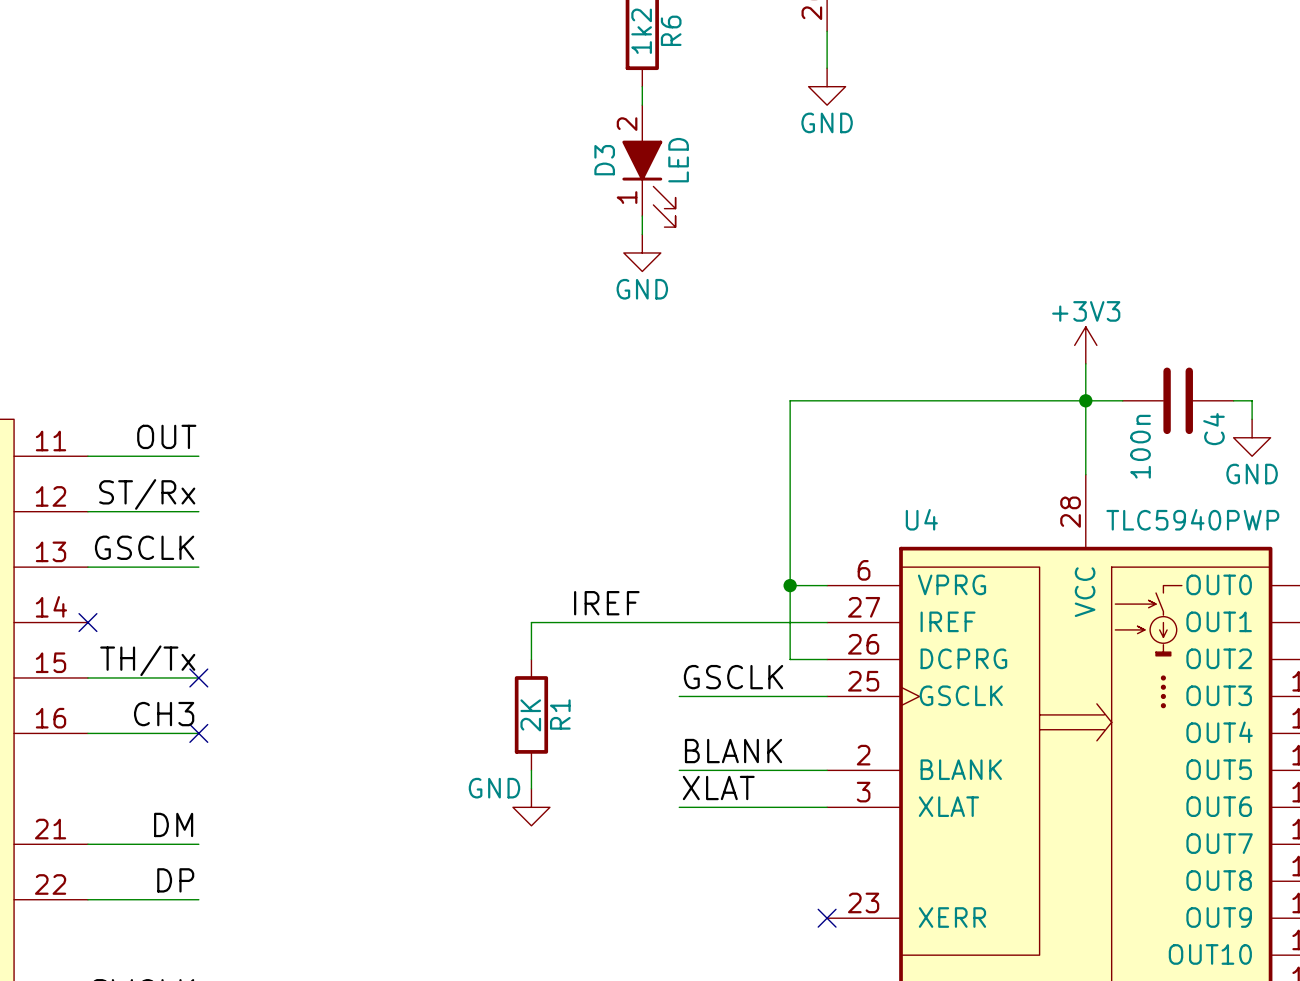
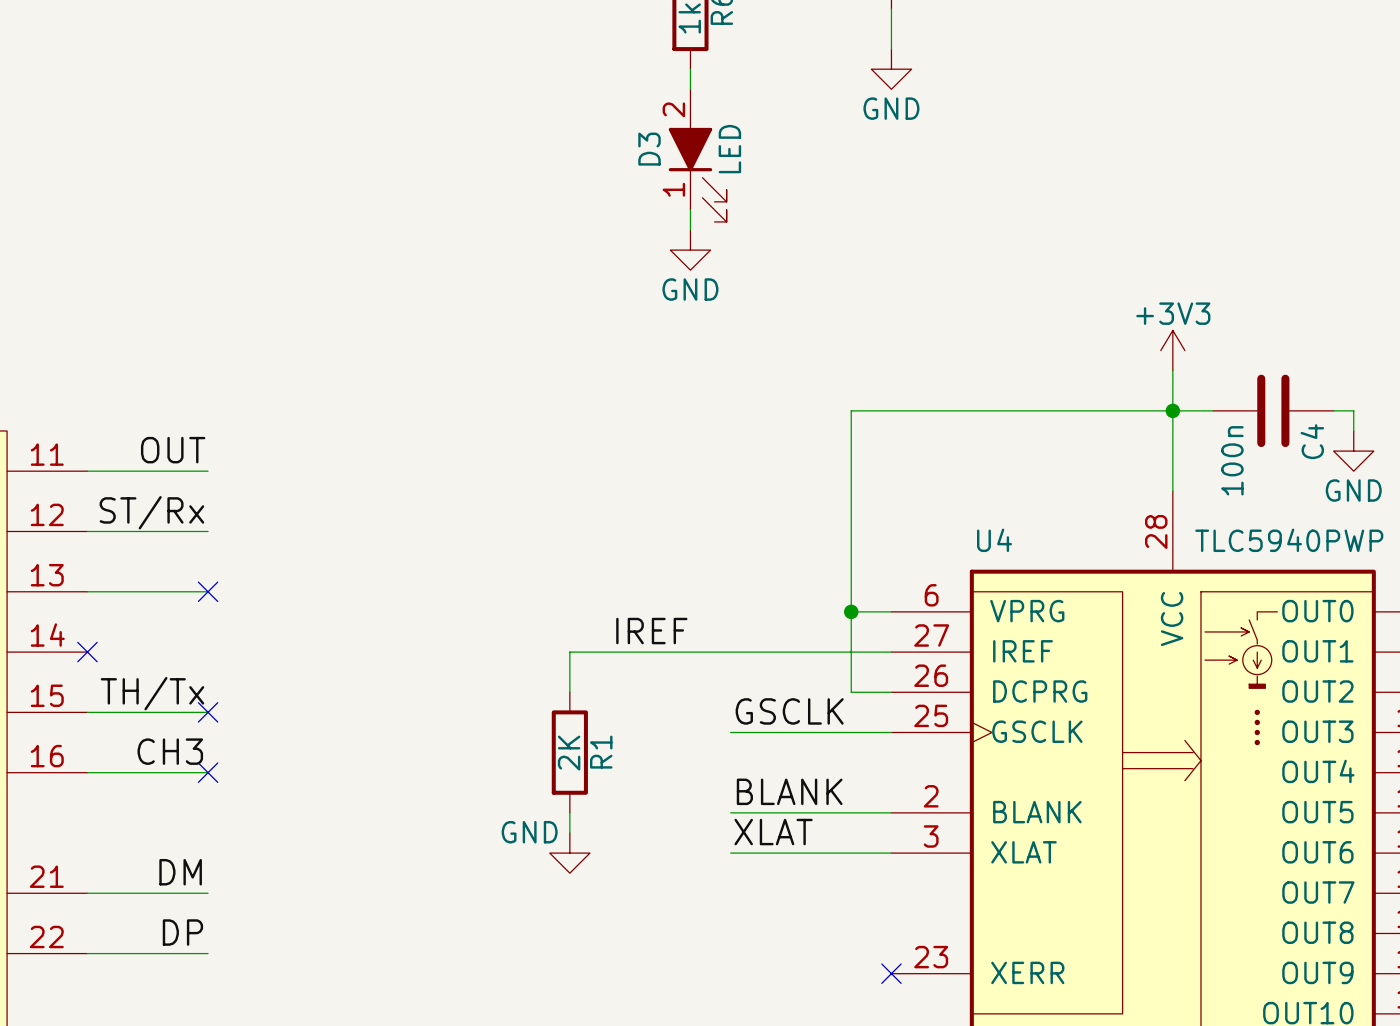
label: GSCLK (144, 547) -> none
no-connect mark: none -> (208, 591)

